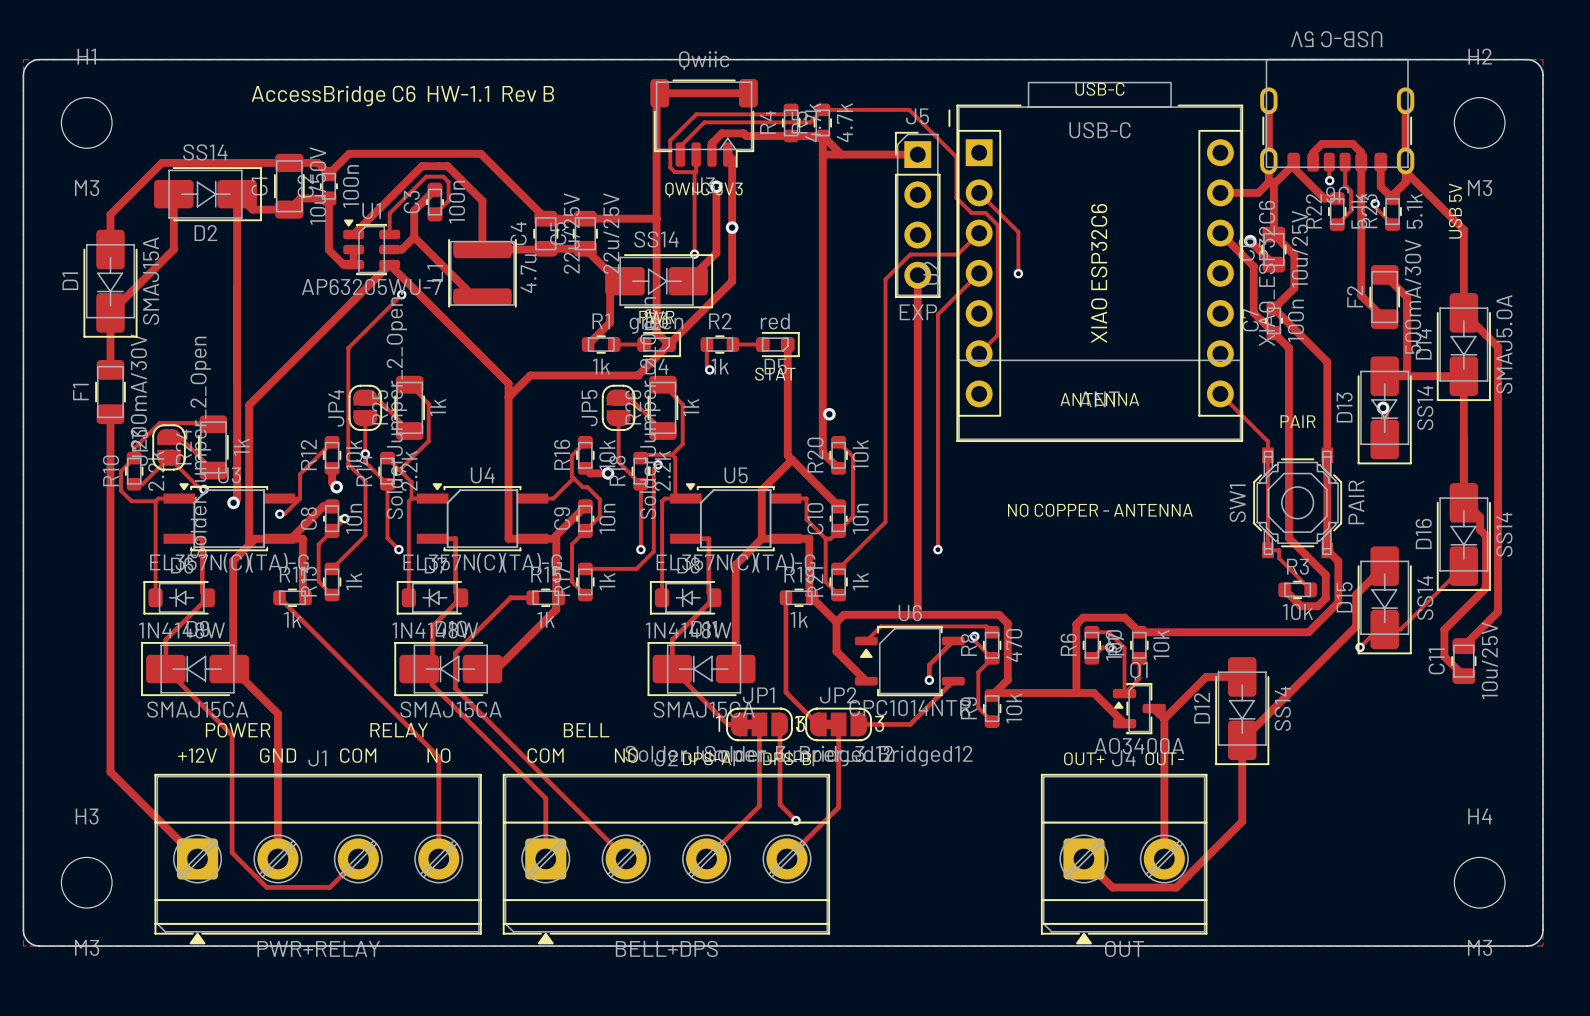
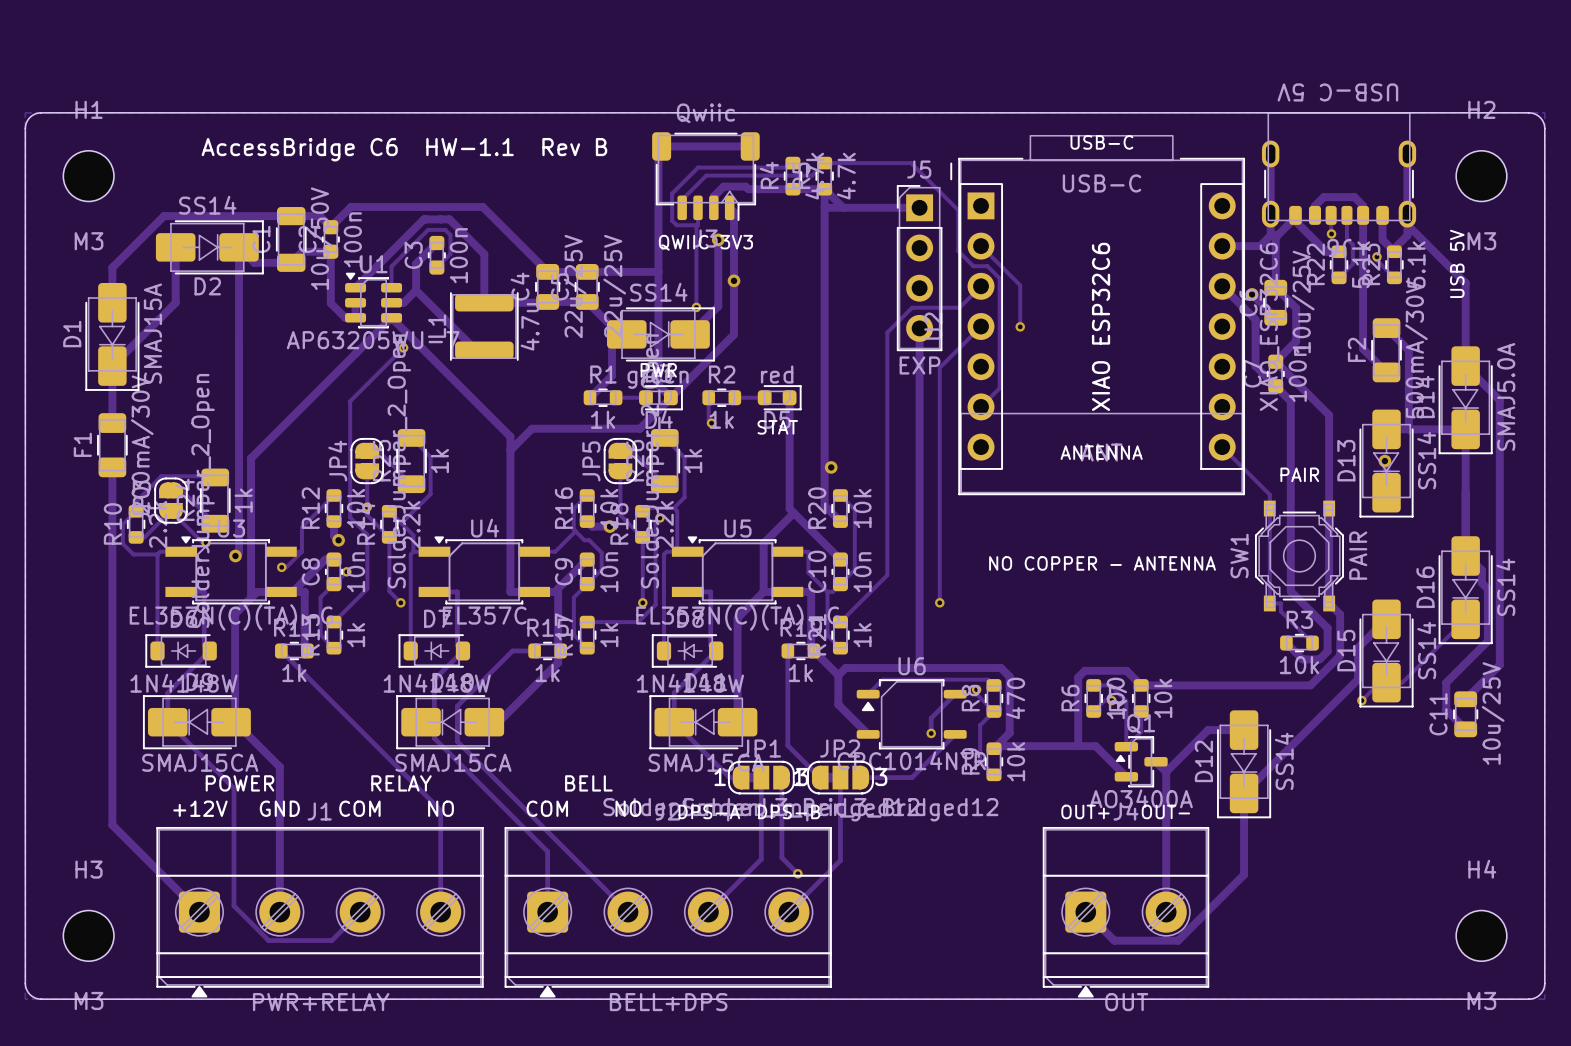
U4 value: EL357N(C)(TA)-G (482, 562) -> EL357C (484, 615)

